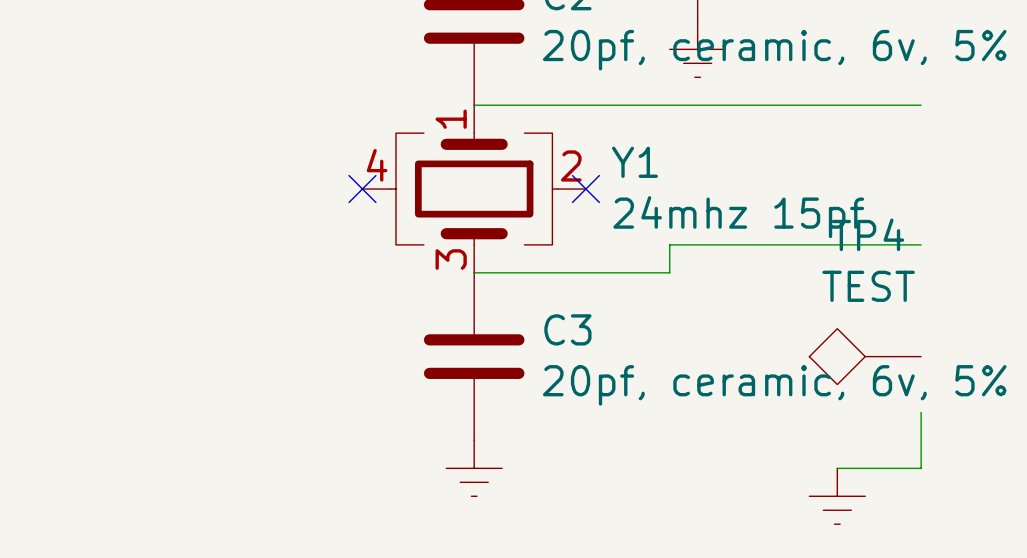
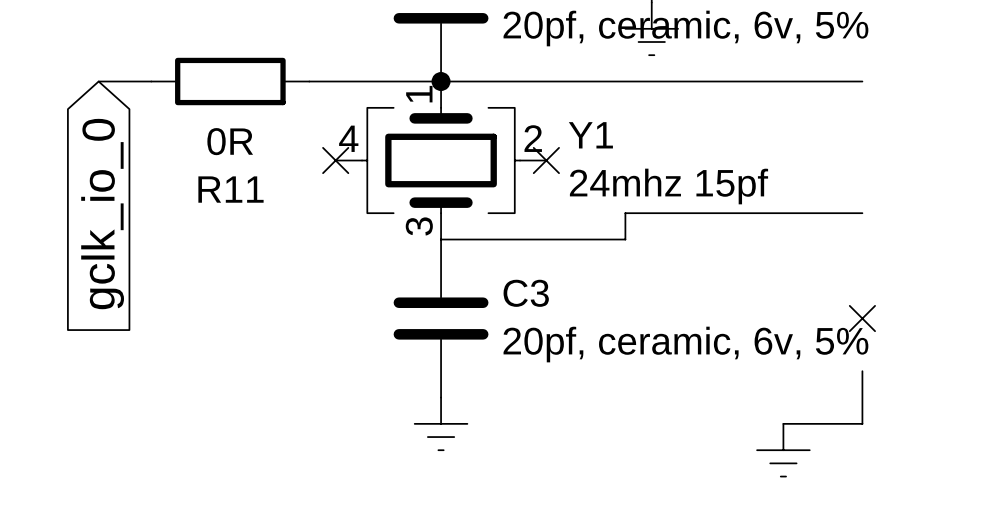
wire: none -> (98, 81) (151, 81)
R11: none -> 0R (230, 81)
wire: none -> (309, 81) (441, 81)
junction: none -> (441, 81)
global label: none -> gclk_io_0 (102, 214)
TP4: TEST (865, 356) -> none
no-connect mark: none -> (862, 318)

